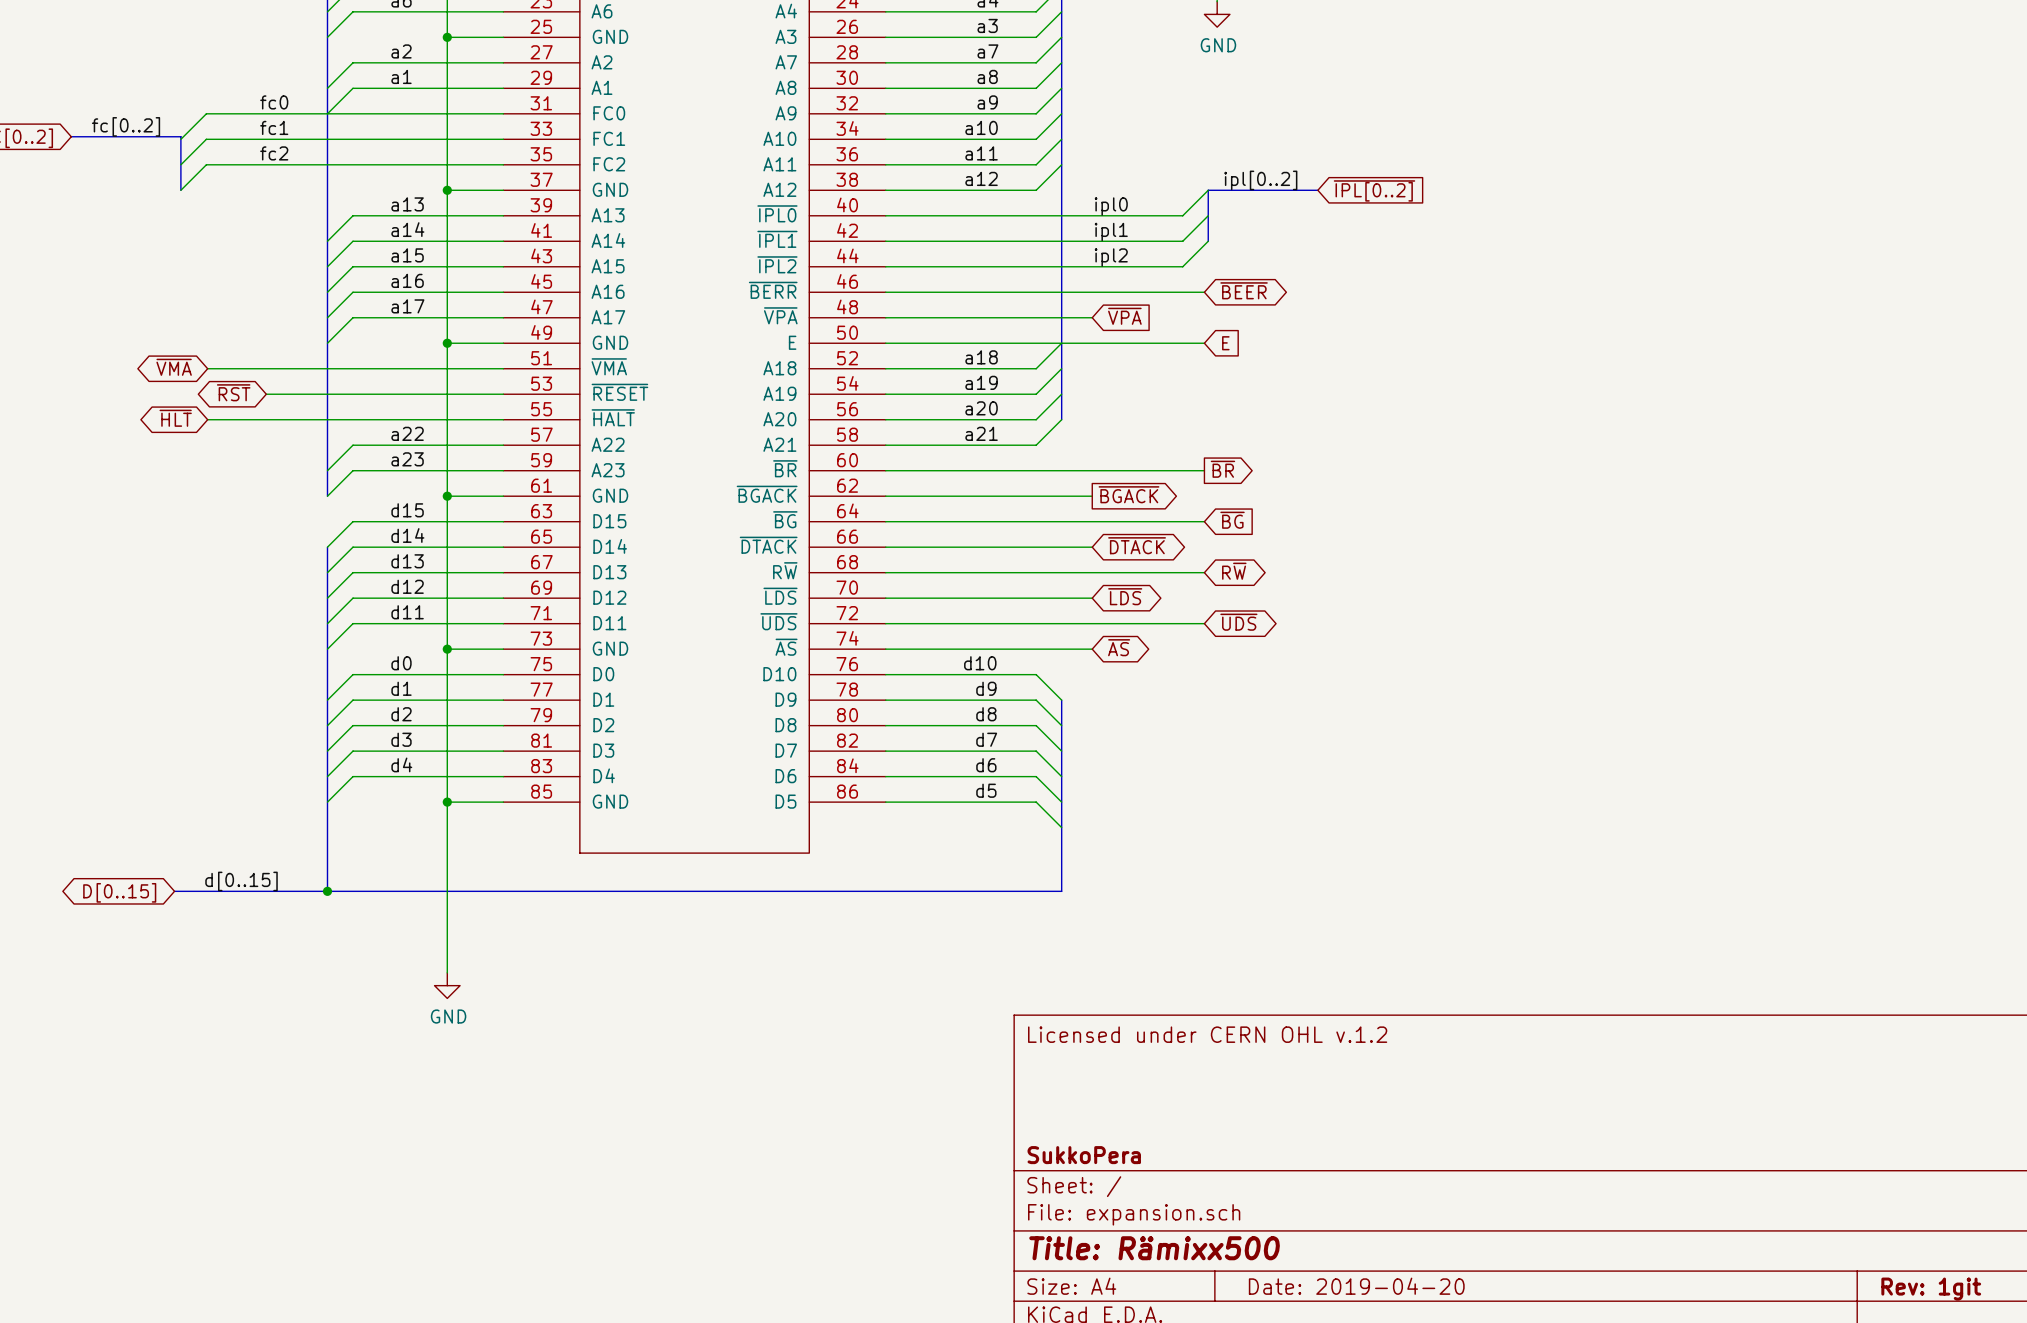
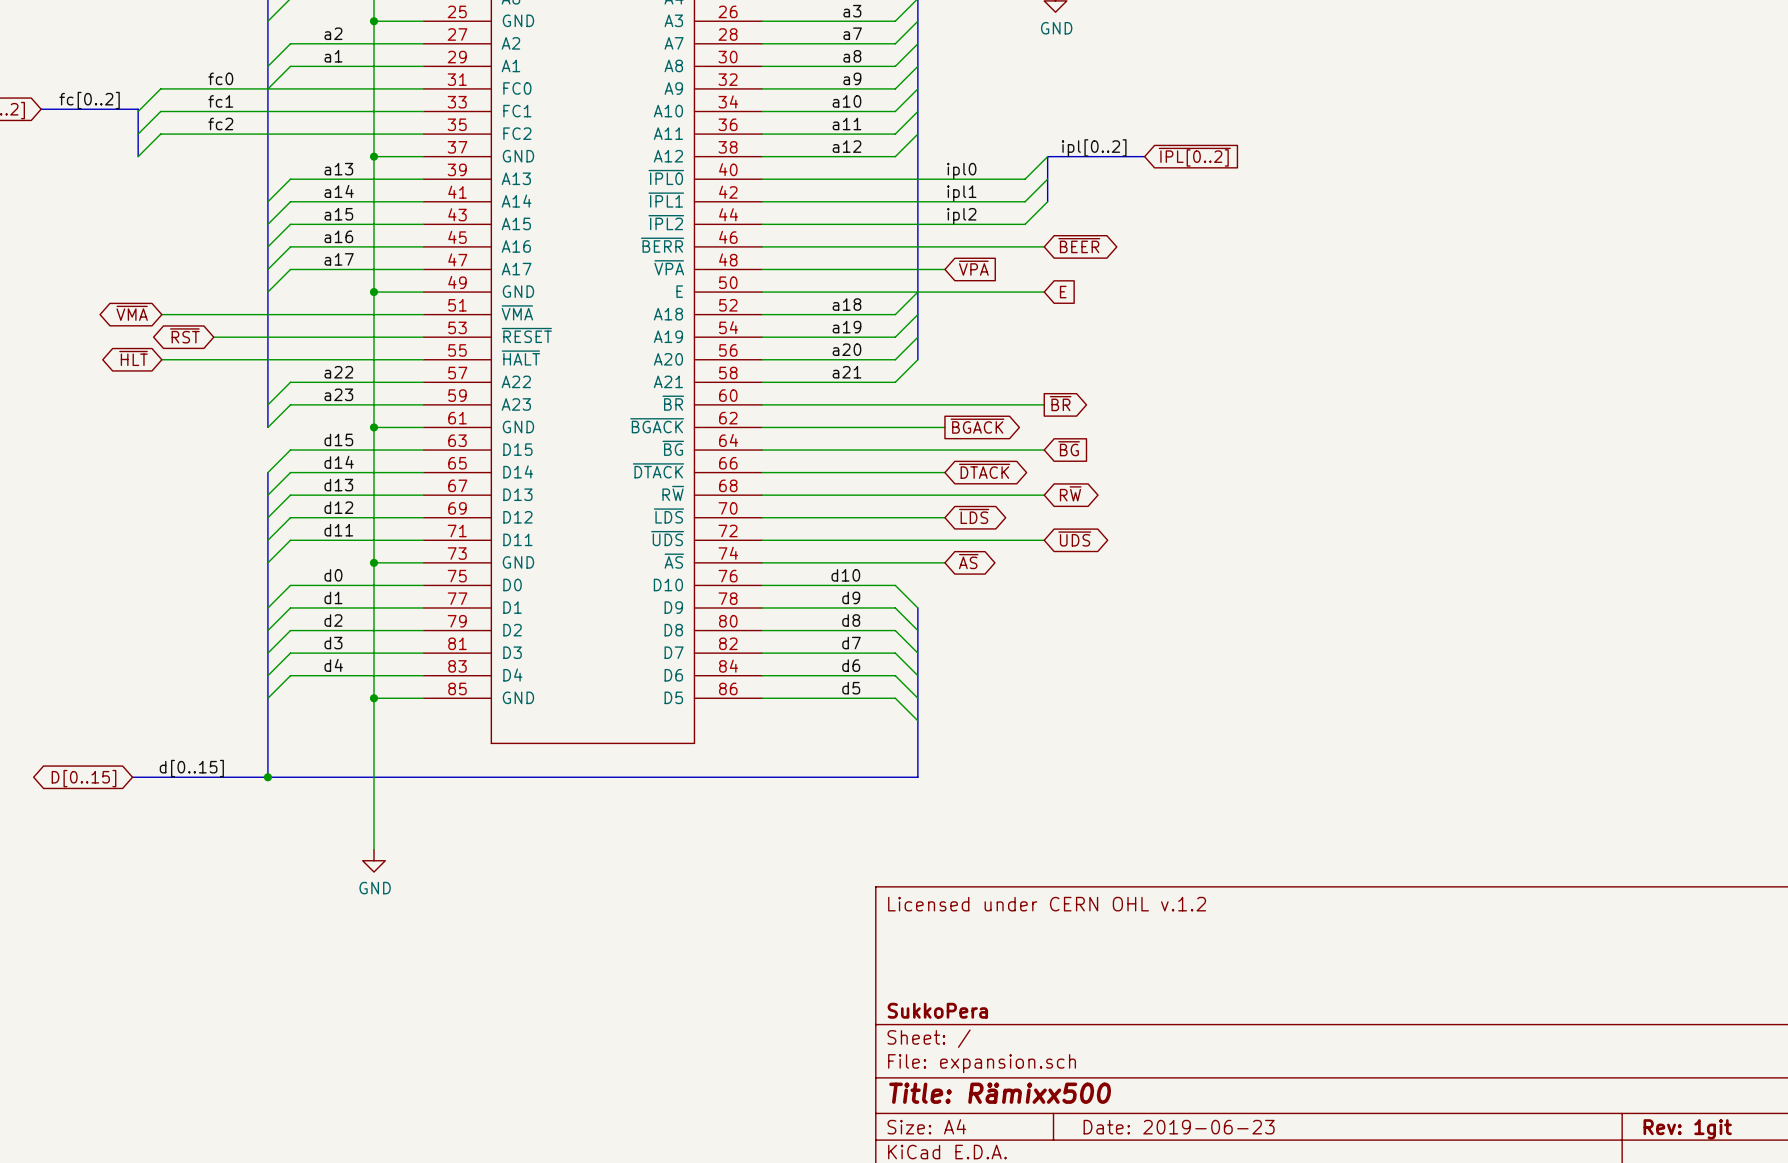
title block: Date: 2019-04-20 (1356, 1286) -> Date: 2019-06-23 (1179, 1127)

